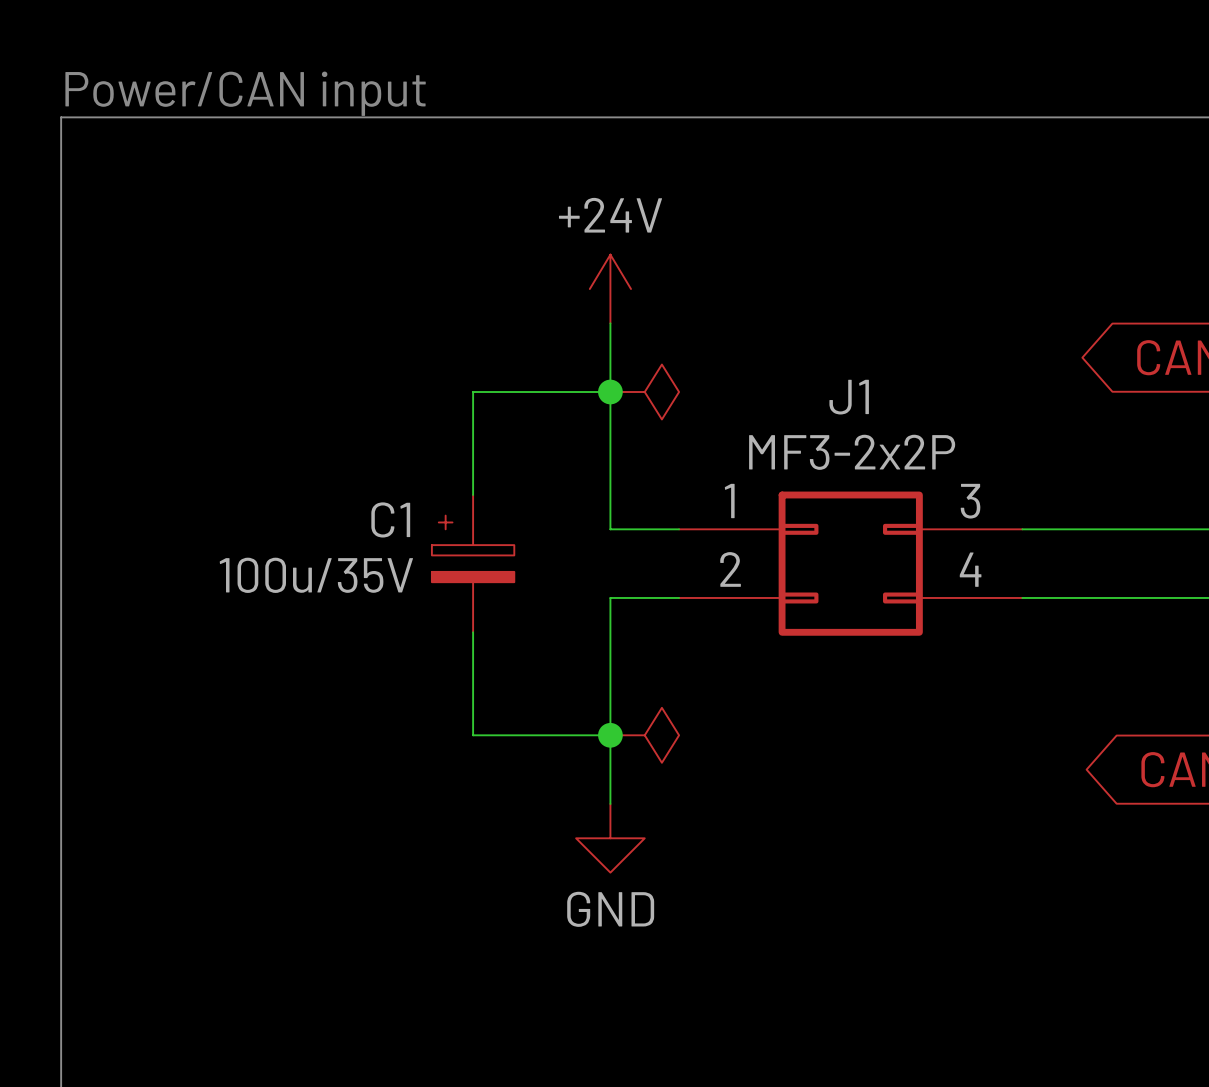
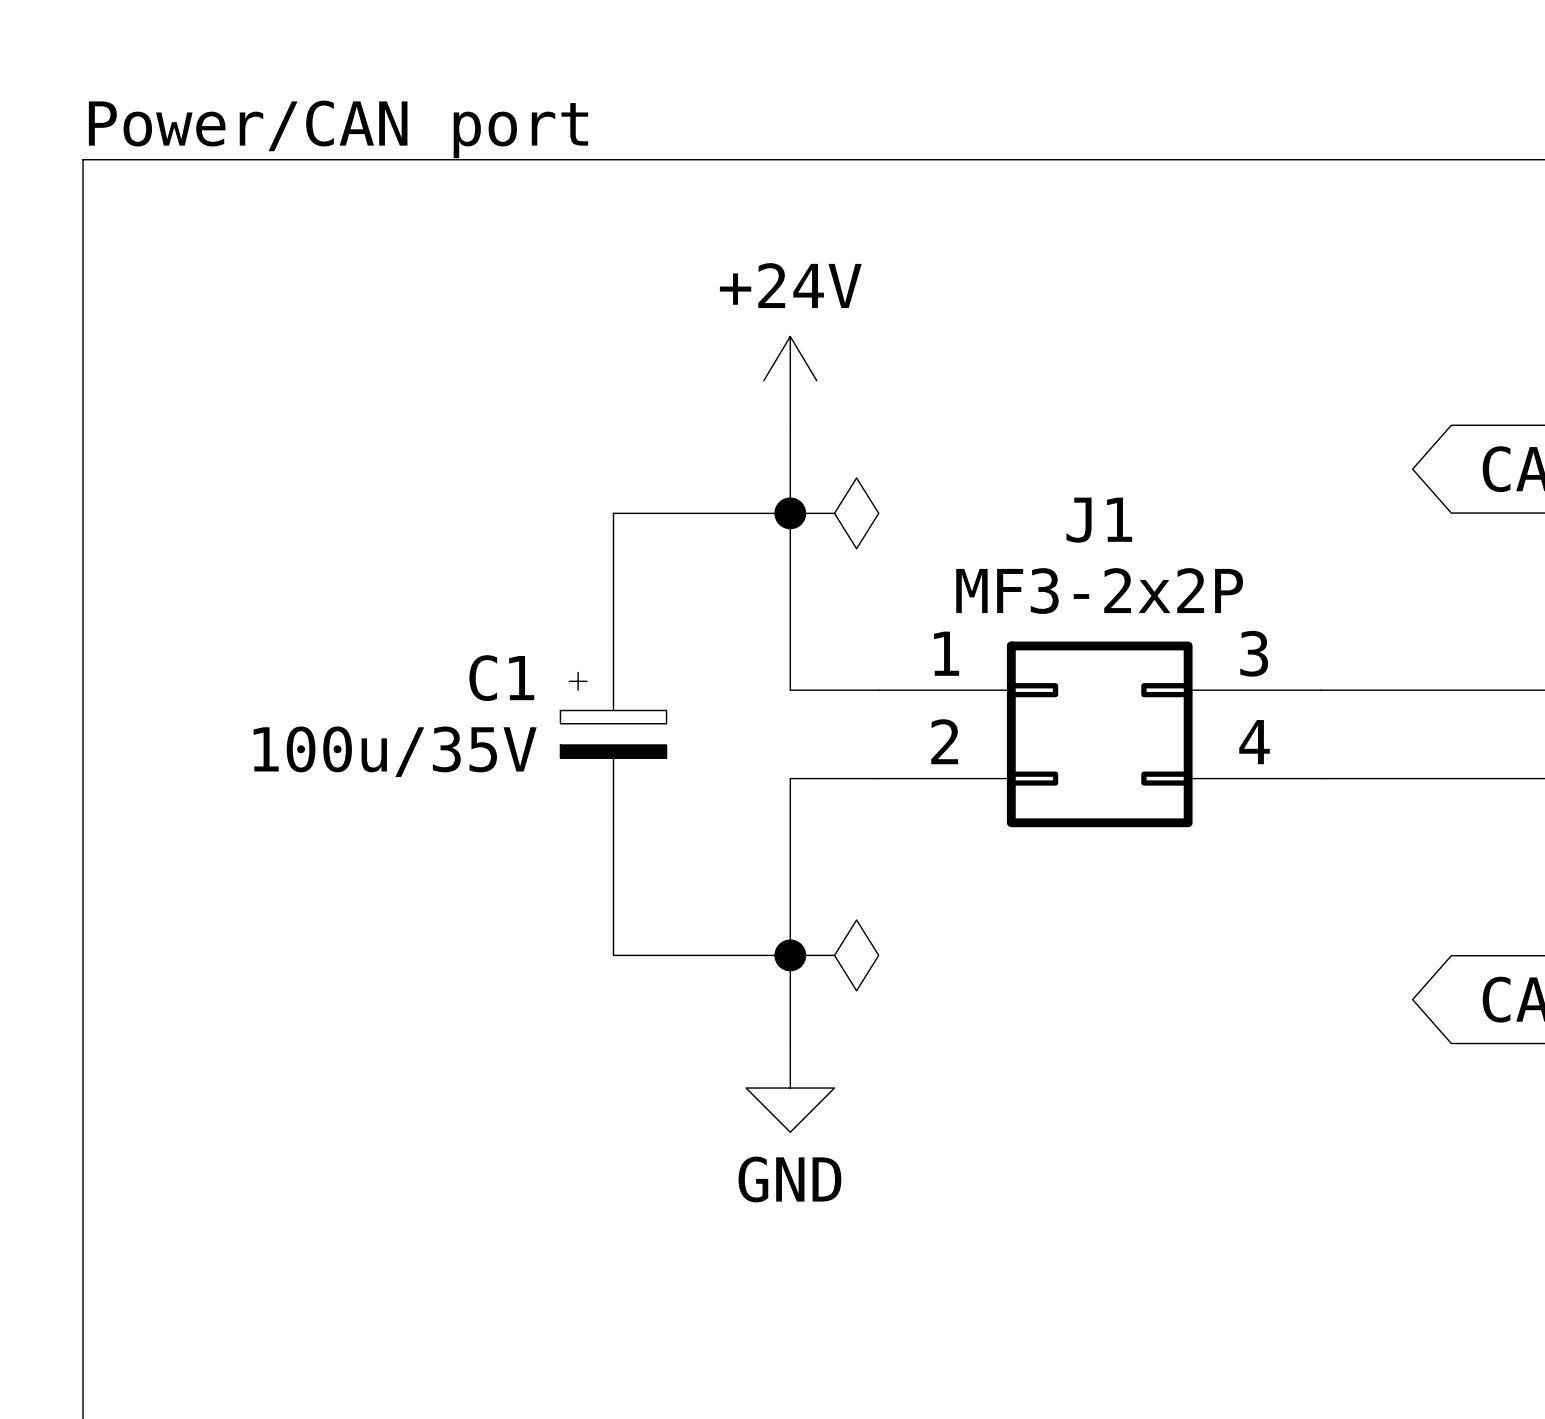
text: Power/CAN input (245, 93) -> Power/CAN port (338, 129)

